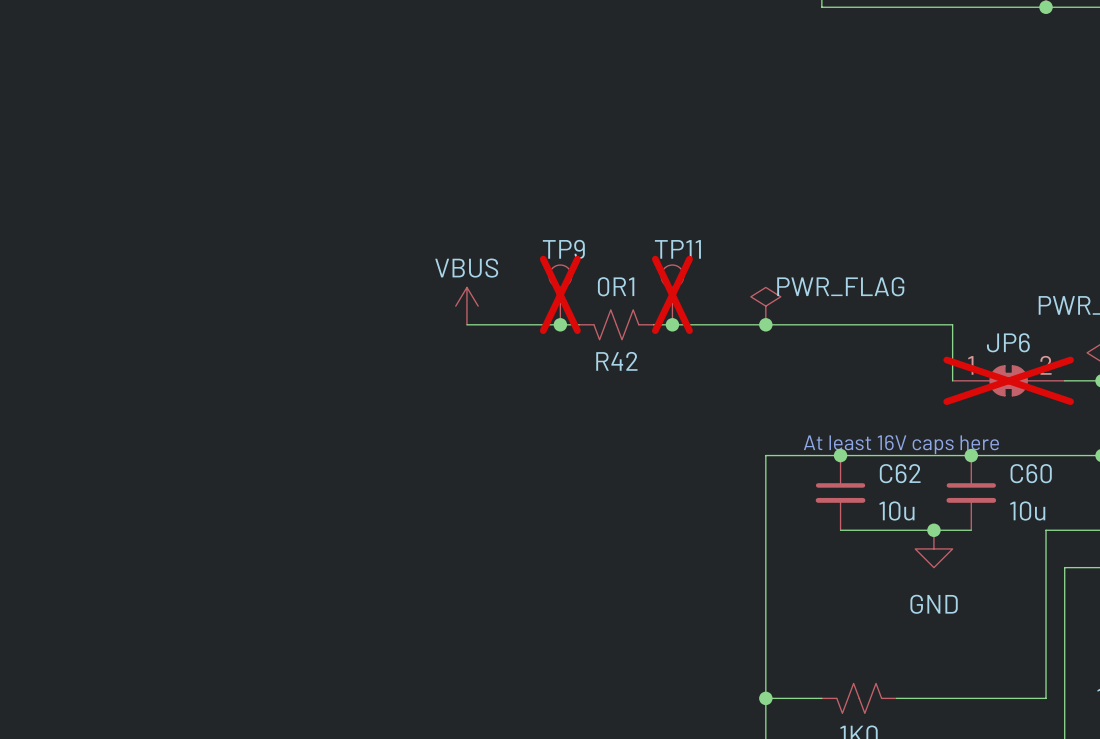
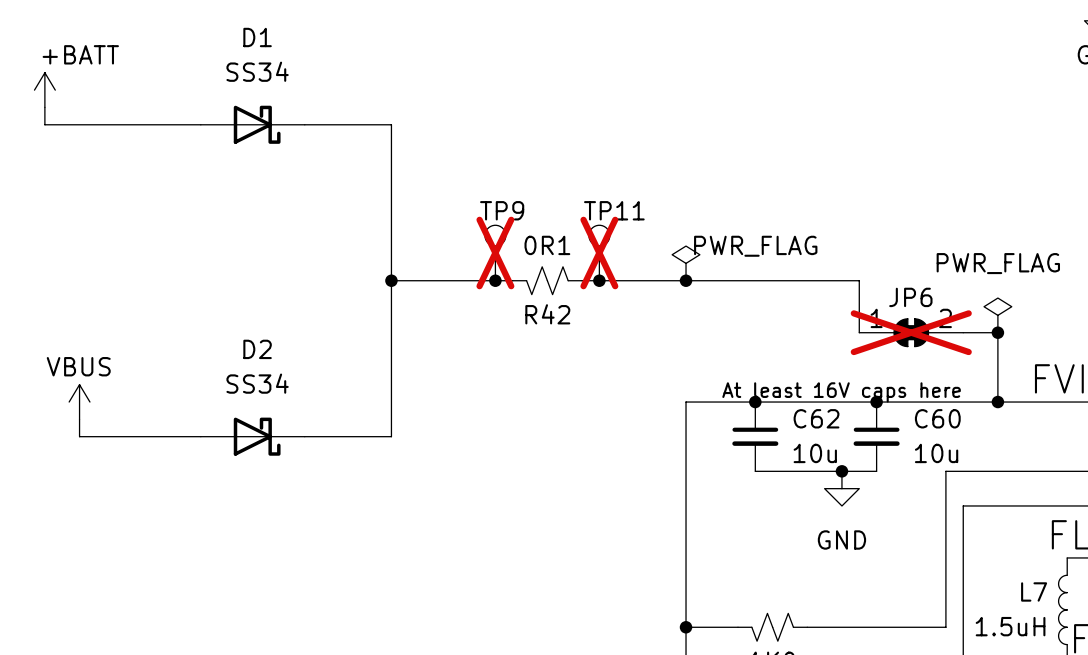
power symbol: none -> +BATT (44, 90)
wire: none -> (44, 107) (44, 124) (200, 124)
D1: none -> SS34 (252, 124)
wire: none -> (304, 124) (391, 124) (391, 436) (304, 436)
power symbol: VBUS (466, 306) -> none
wire: none -> (391, 280) (408, 280)
junction: none -> (391, 280)
power symbol: none -> VBUS (79, 402)
wire: none -> (79, 419) (79, 436) (200, 436)
D2: none -> SS34 (252, 436)

